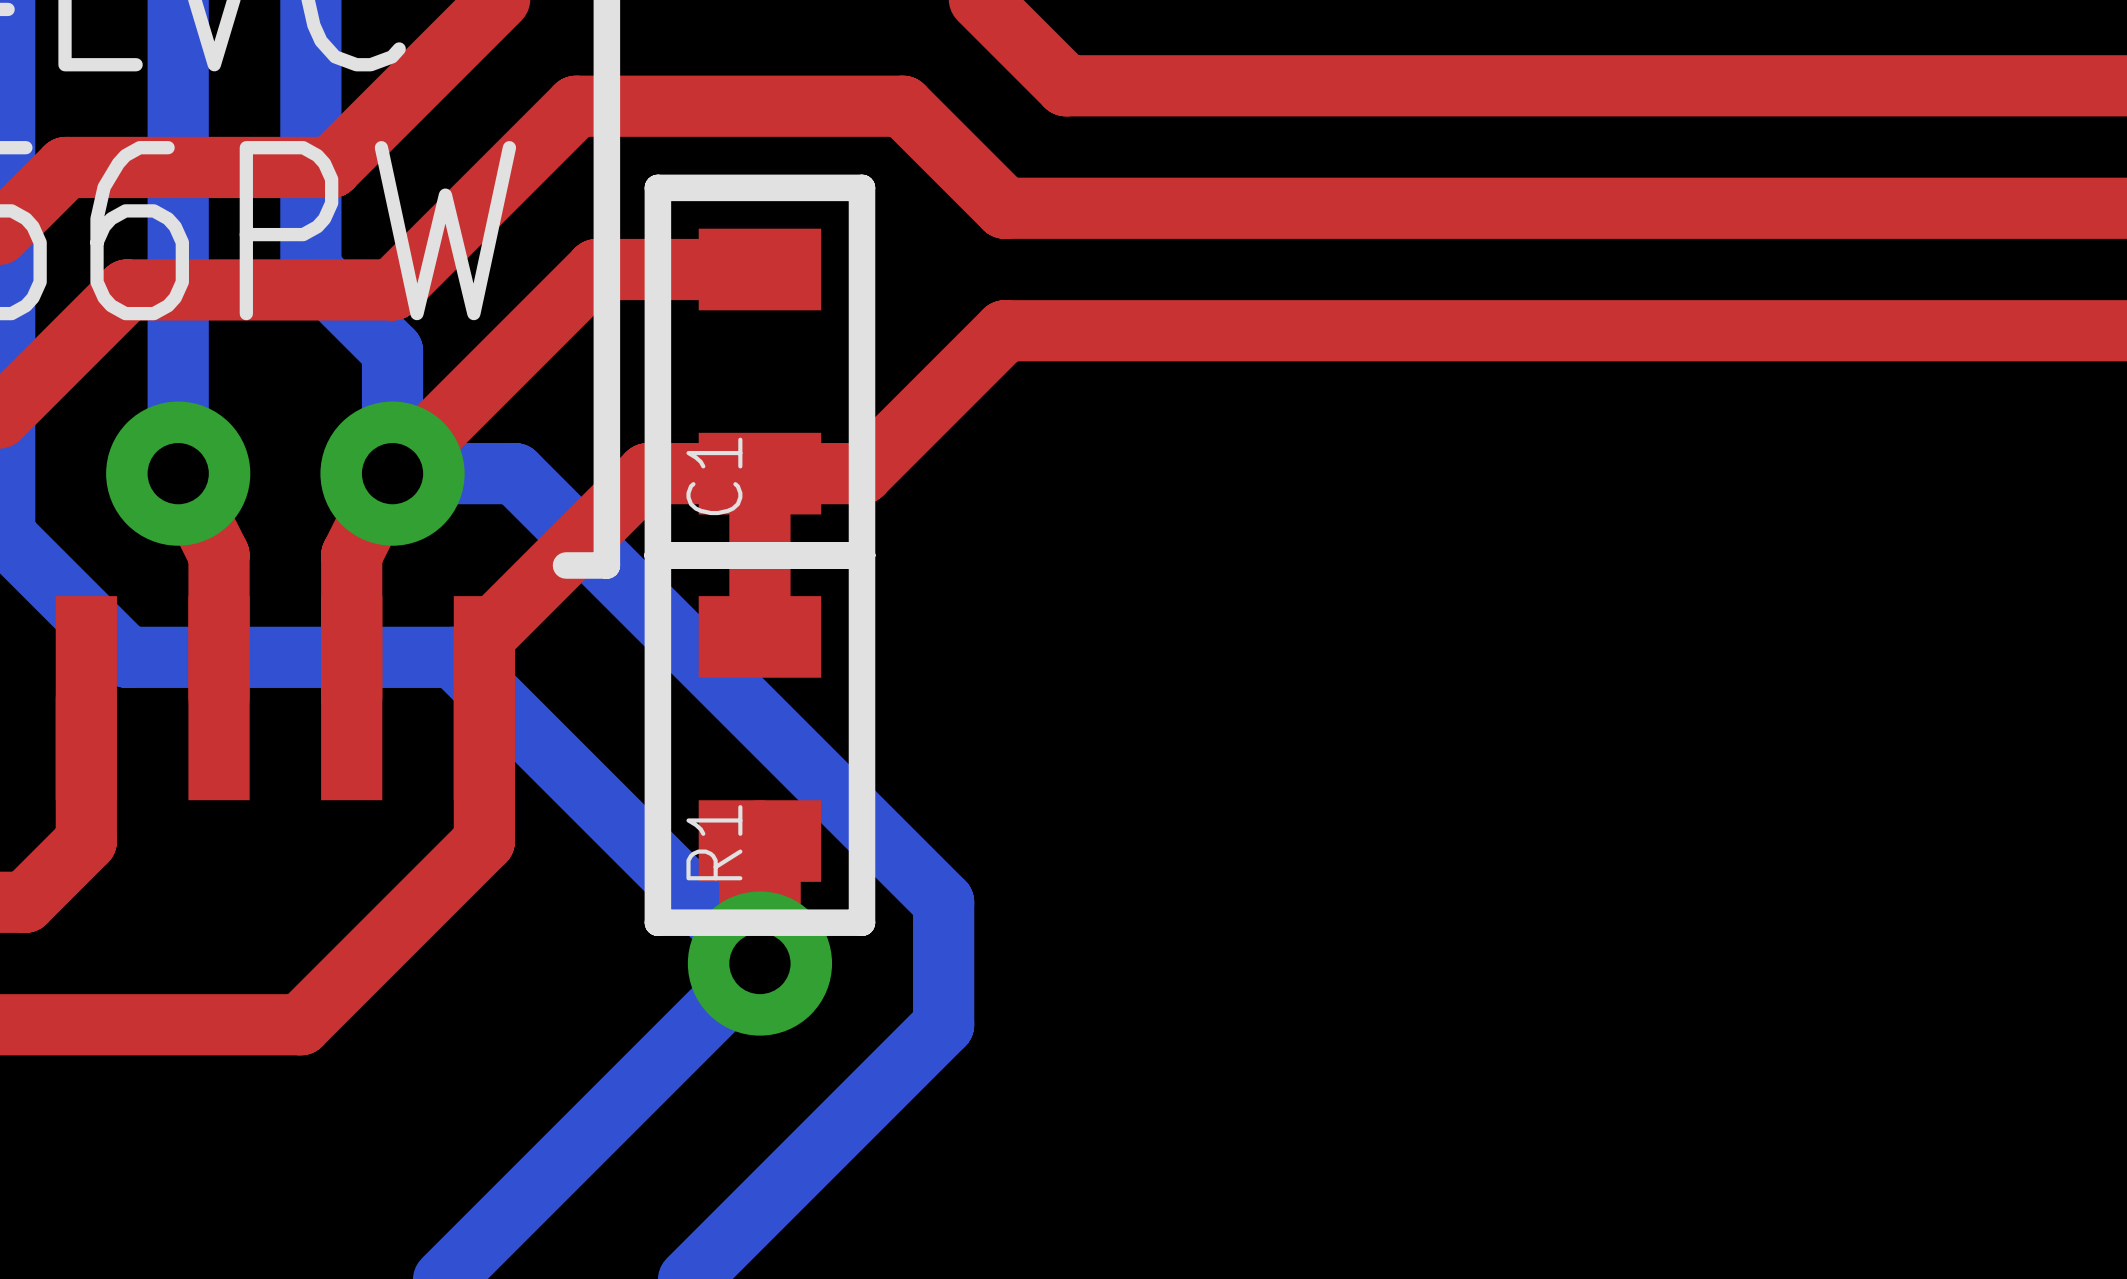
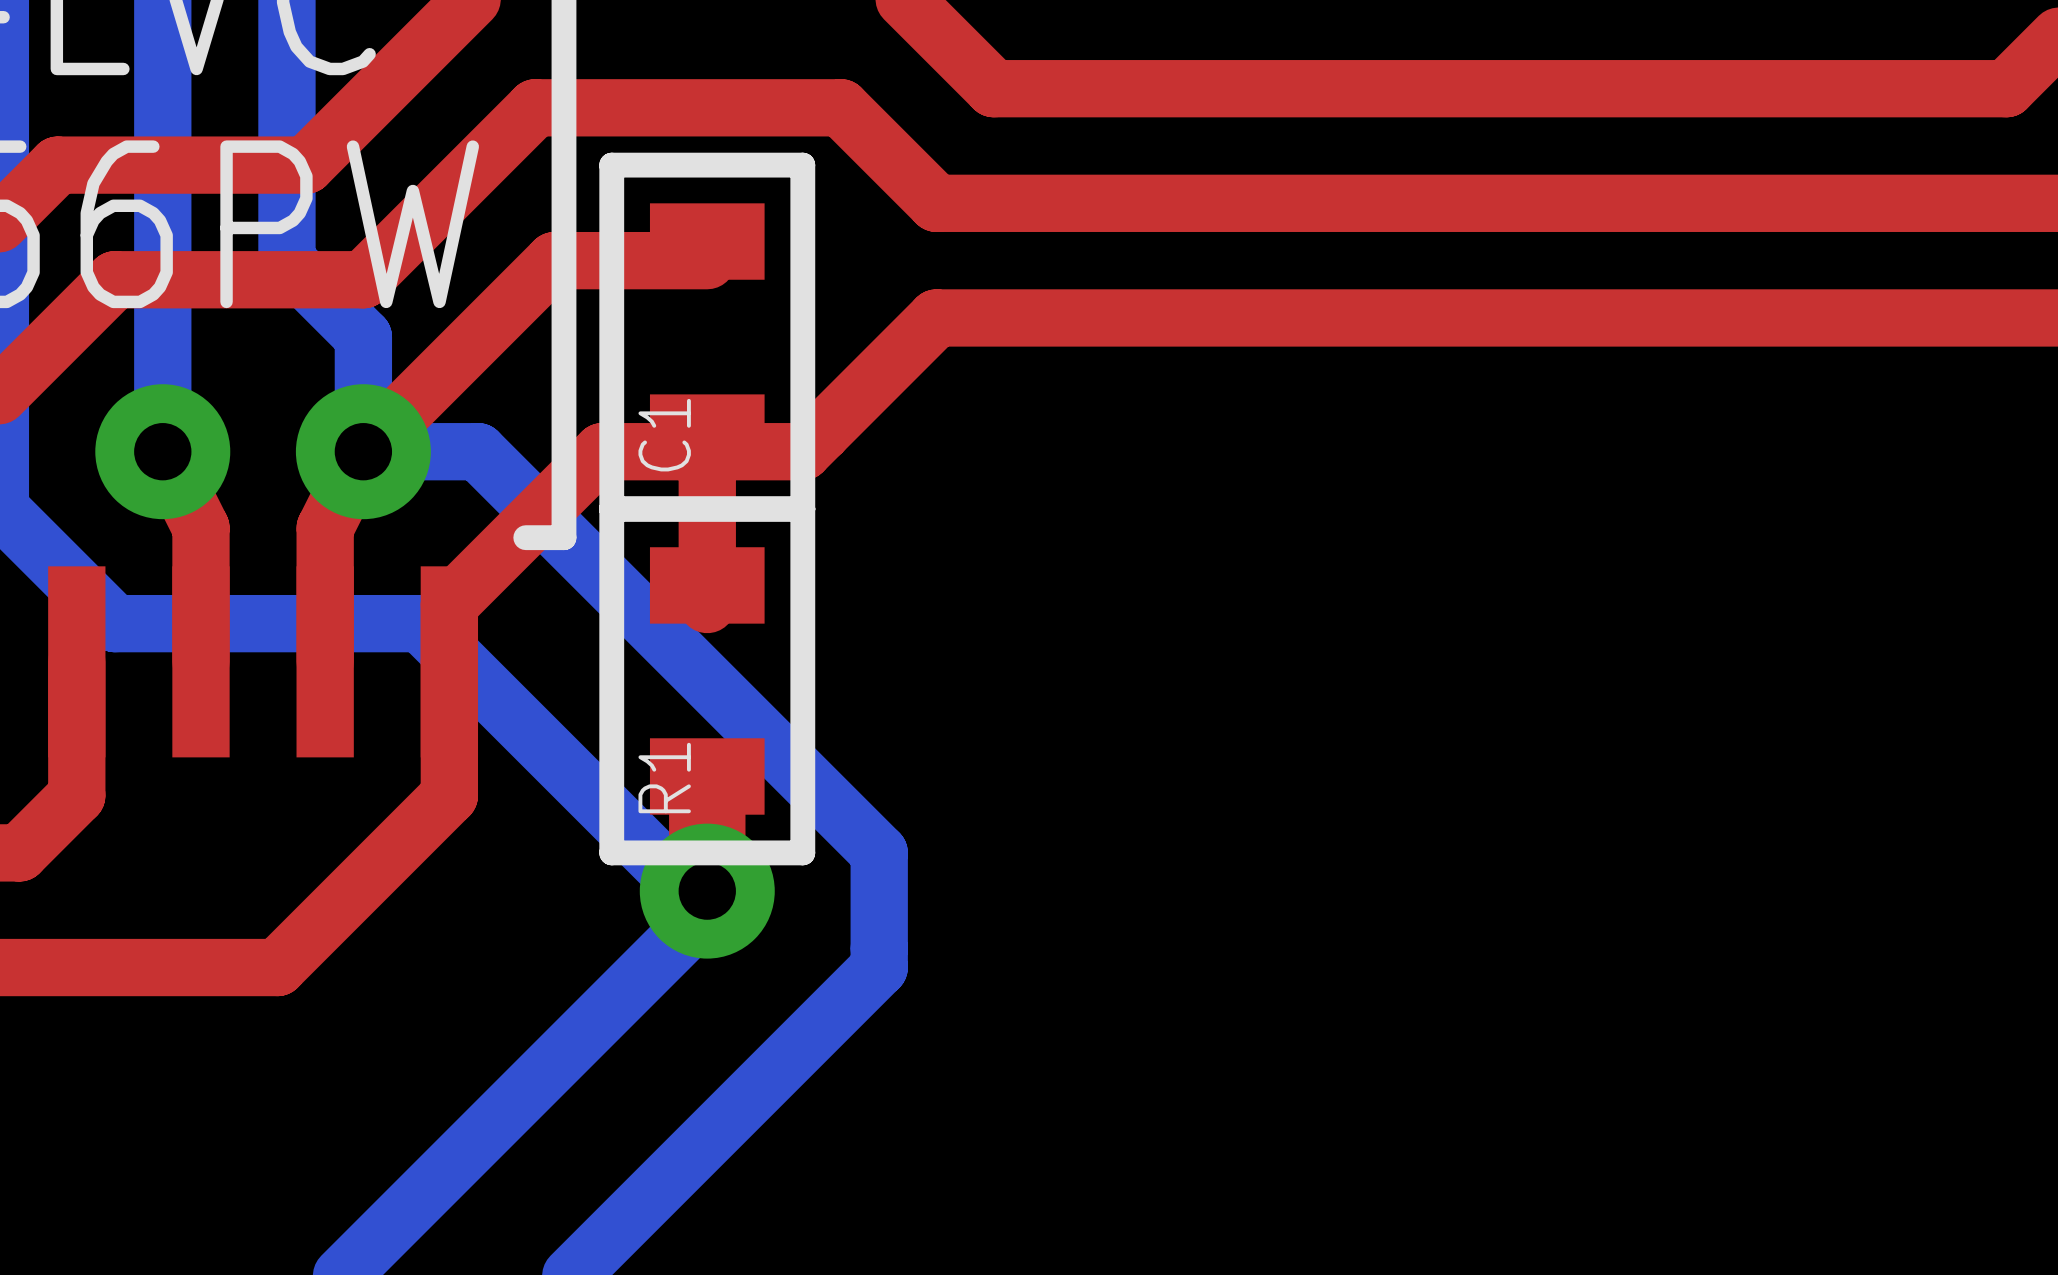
C1 position: (759, 371) -> (707, 337)
R1 position: (759, 738) -> (707, 680)
via position: (759, 963) -> (707, 891)

